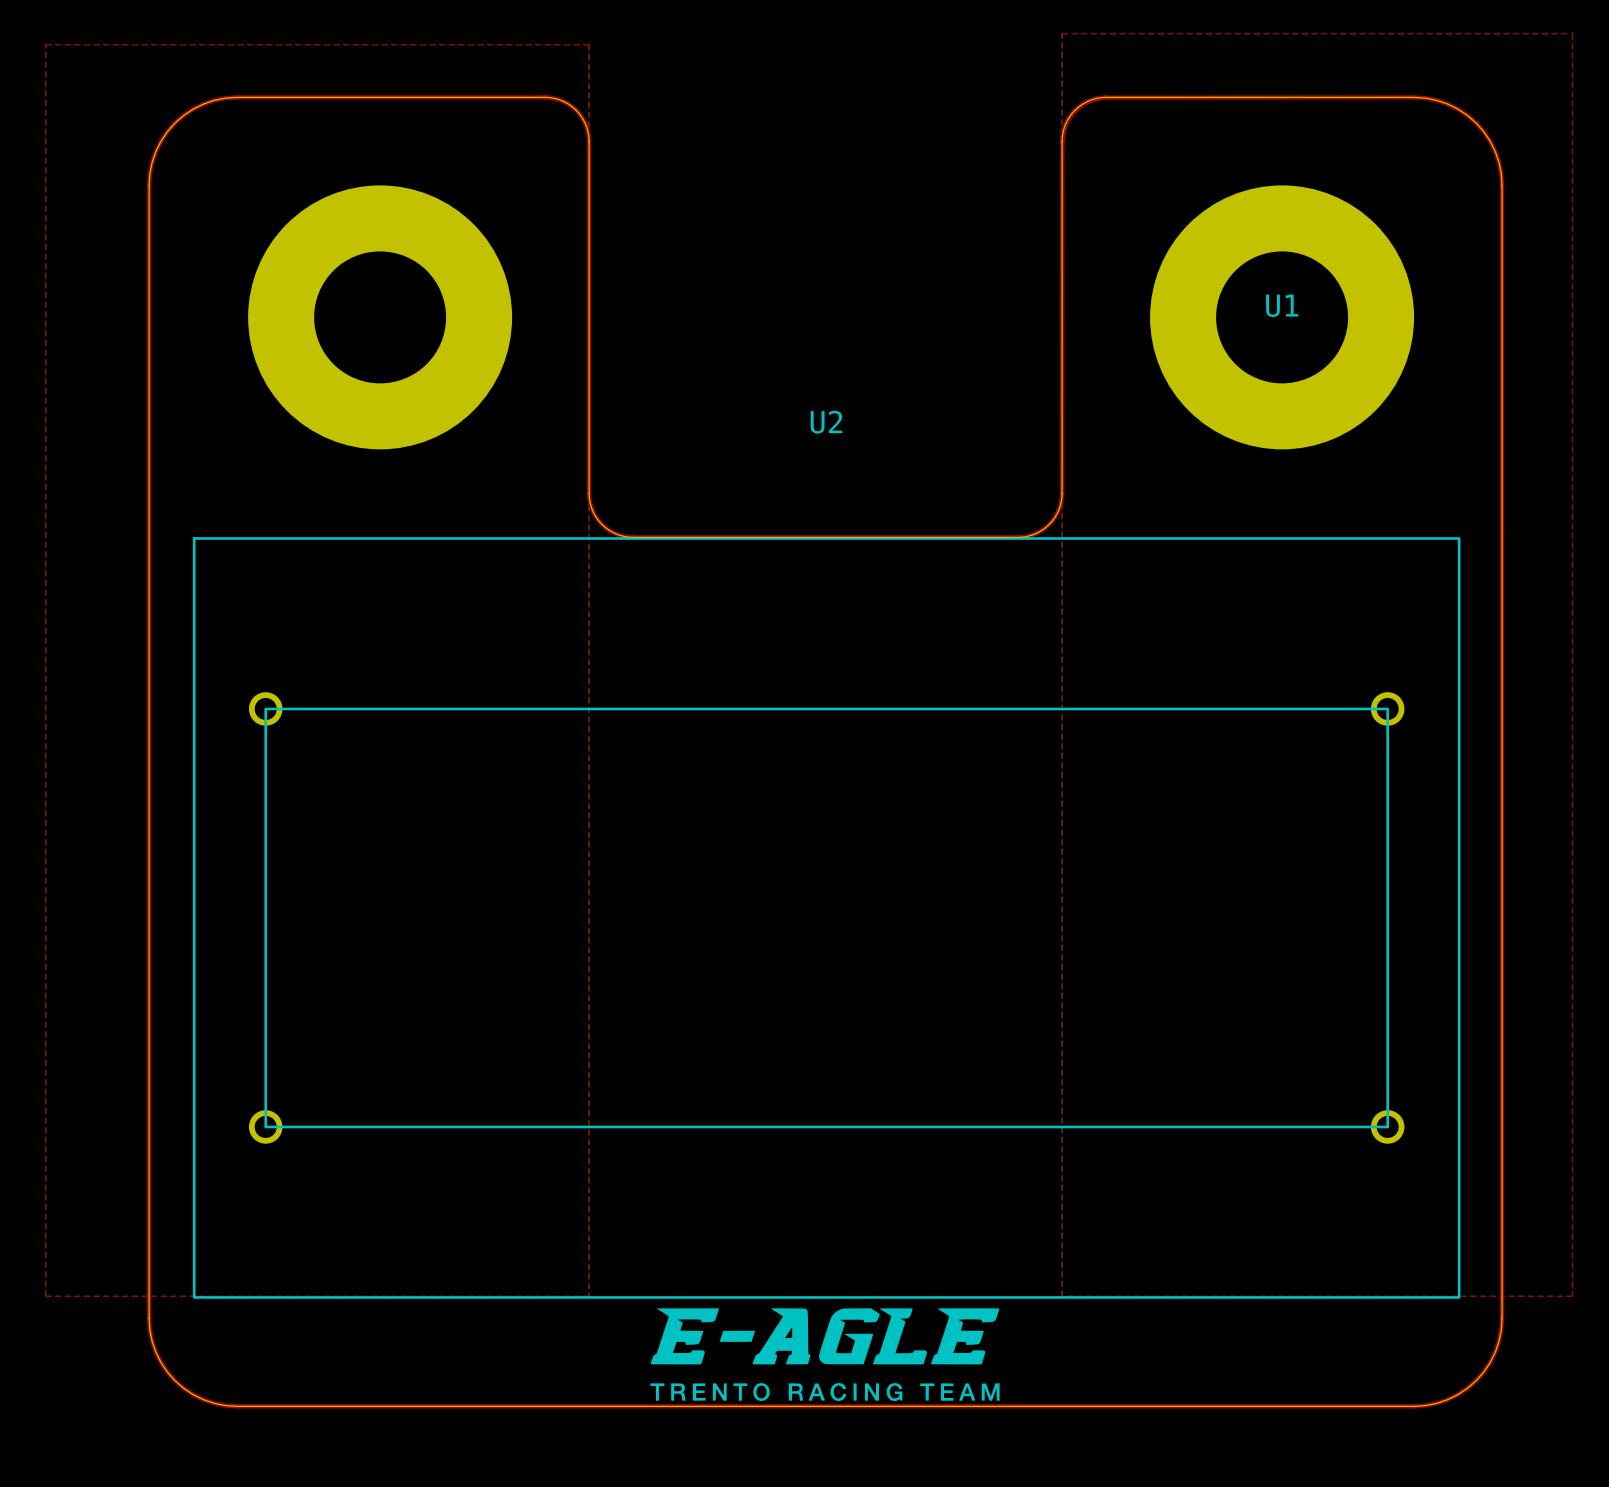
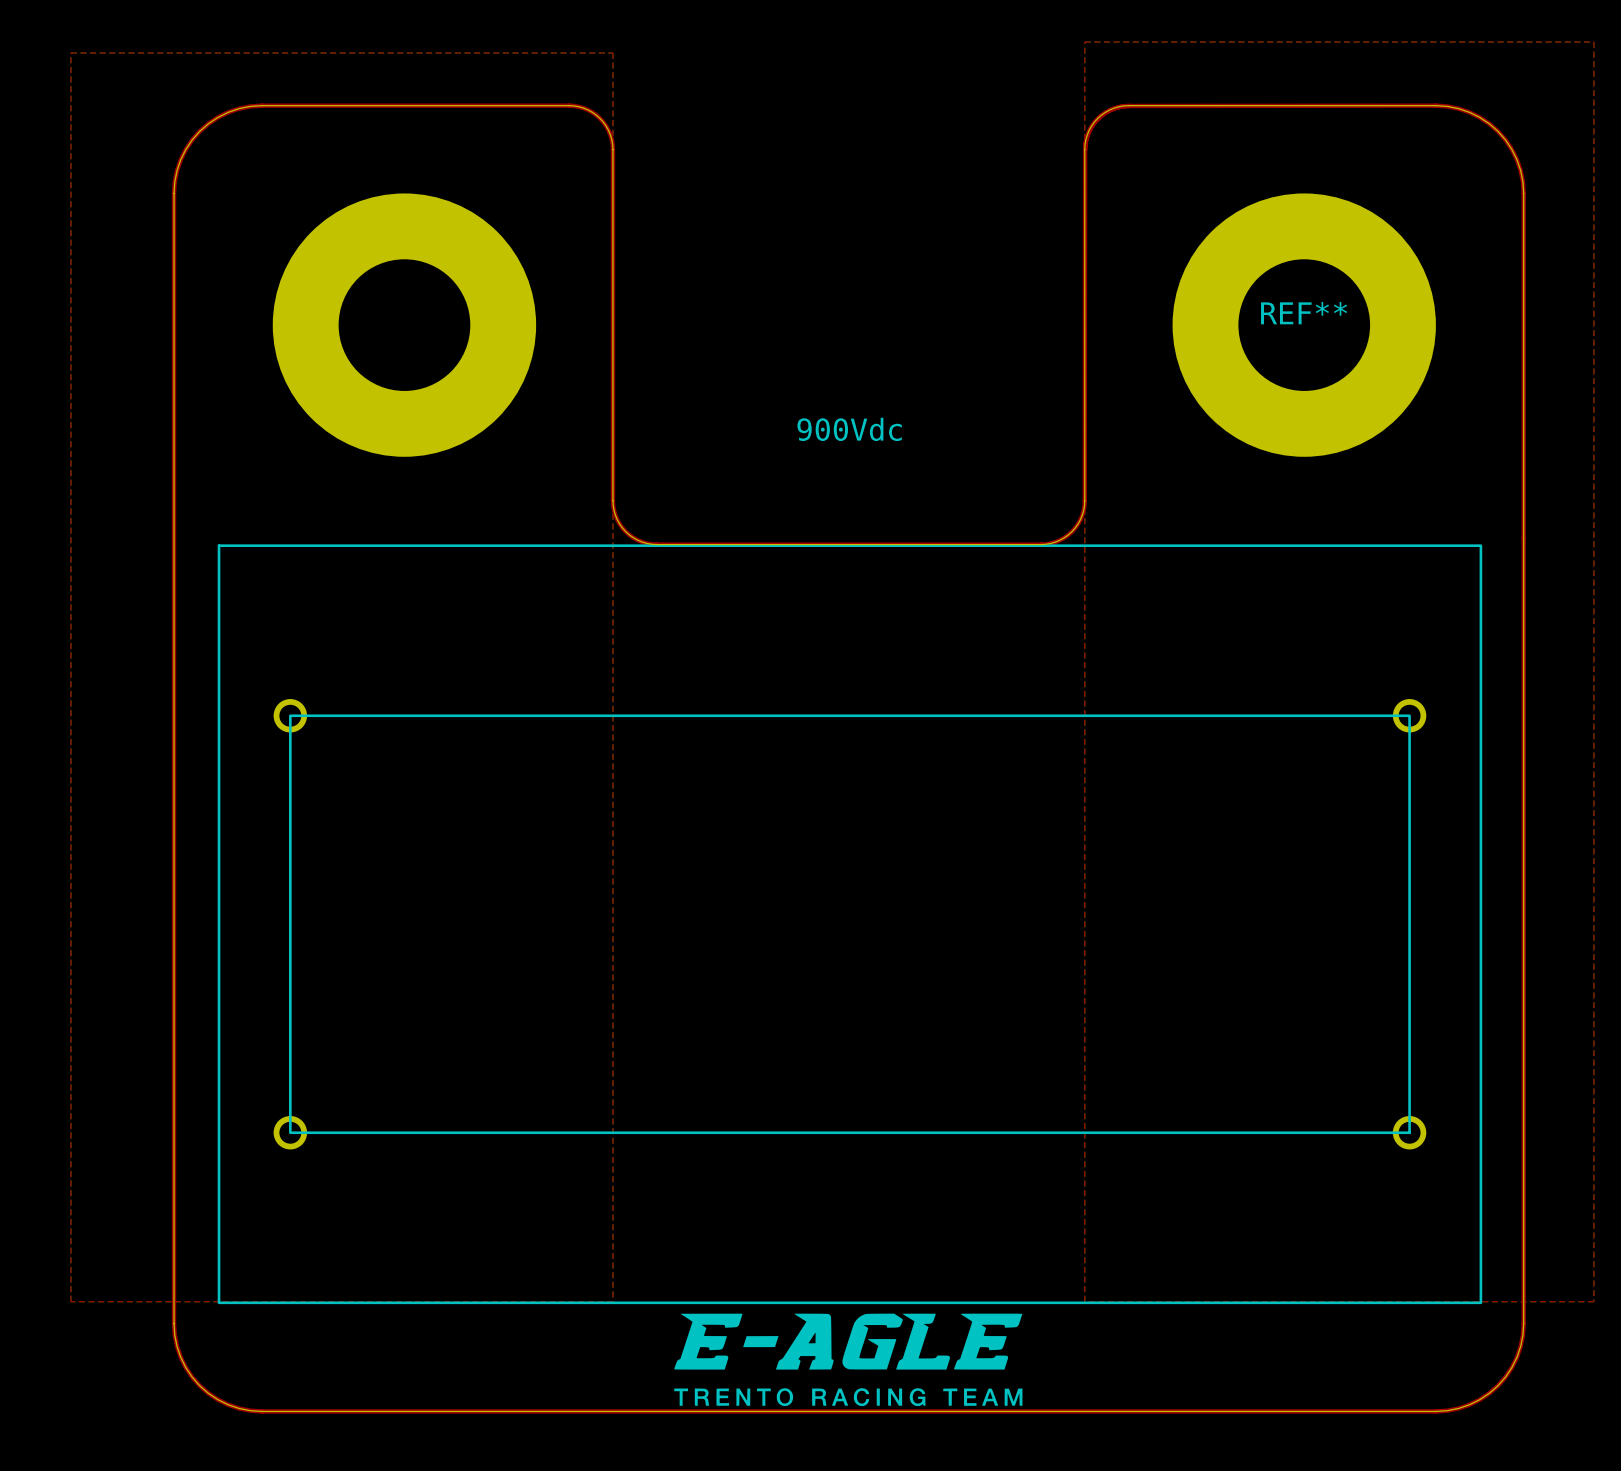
U1 name: U1 (1282, 305) -> REF** (1304, 313)
U2 name: U2 (826, 422) -> 900Vdc (849, 429)

